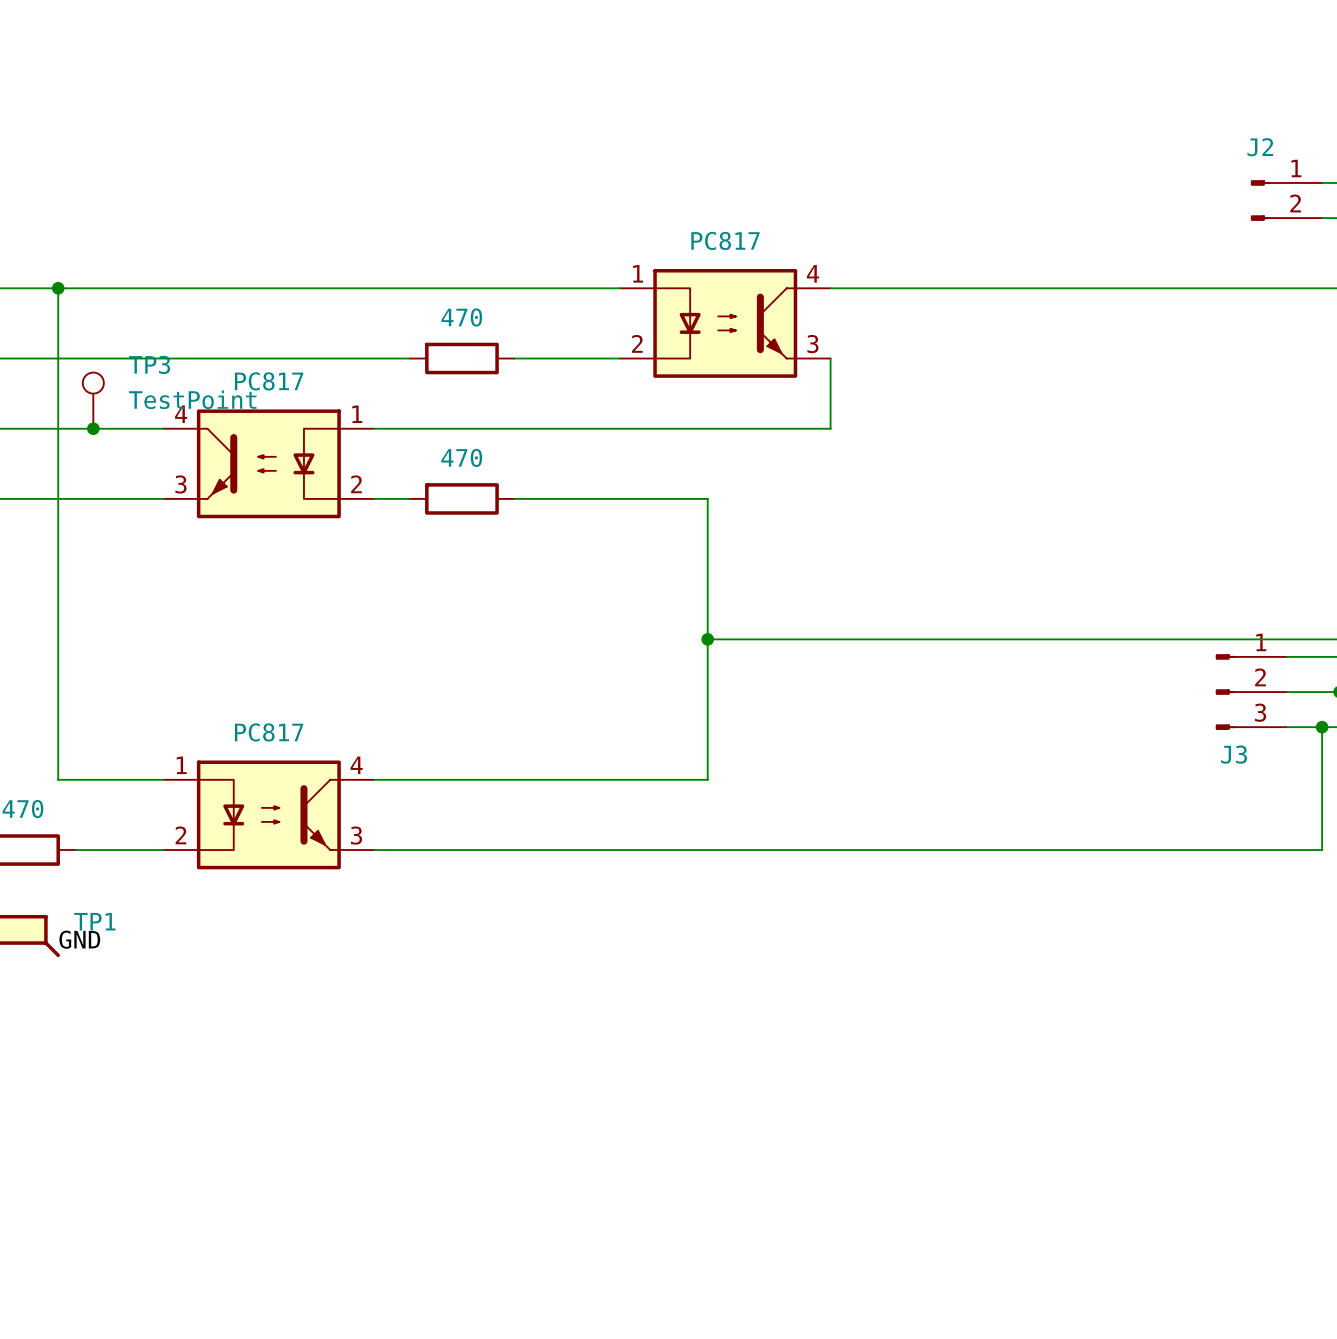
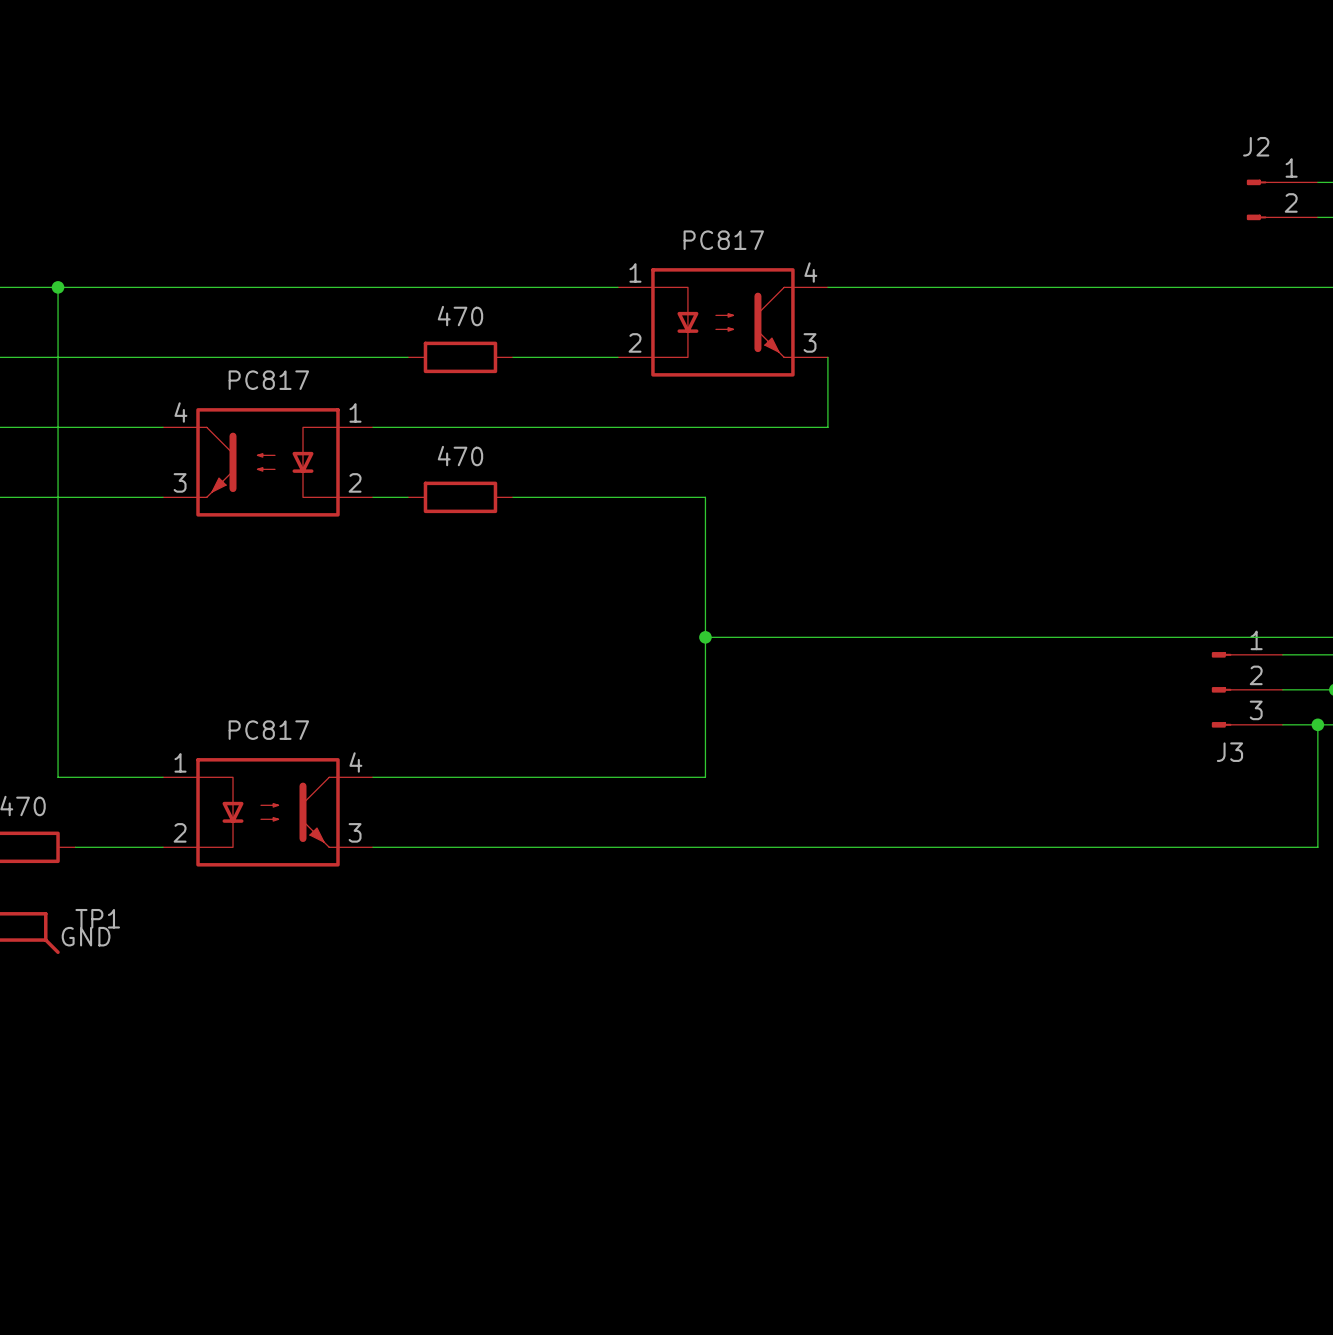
TP3: TestPoint (93, 400) -> none
junction: (93, 428) -> none

